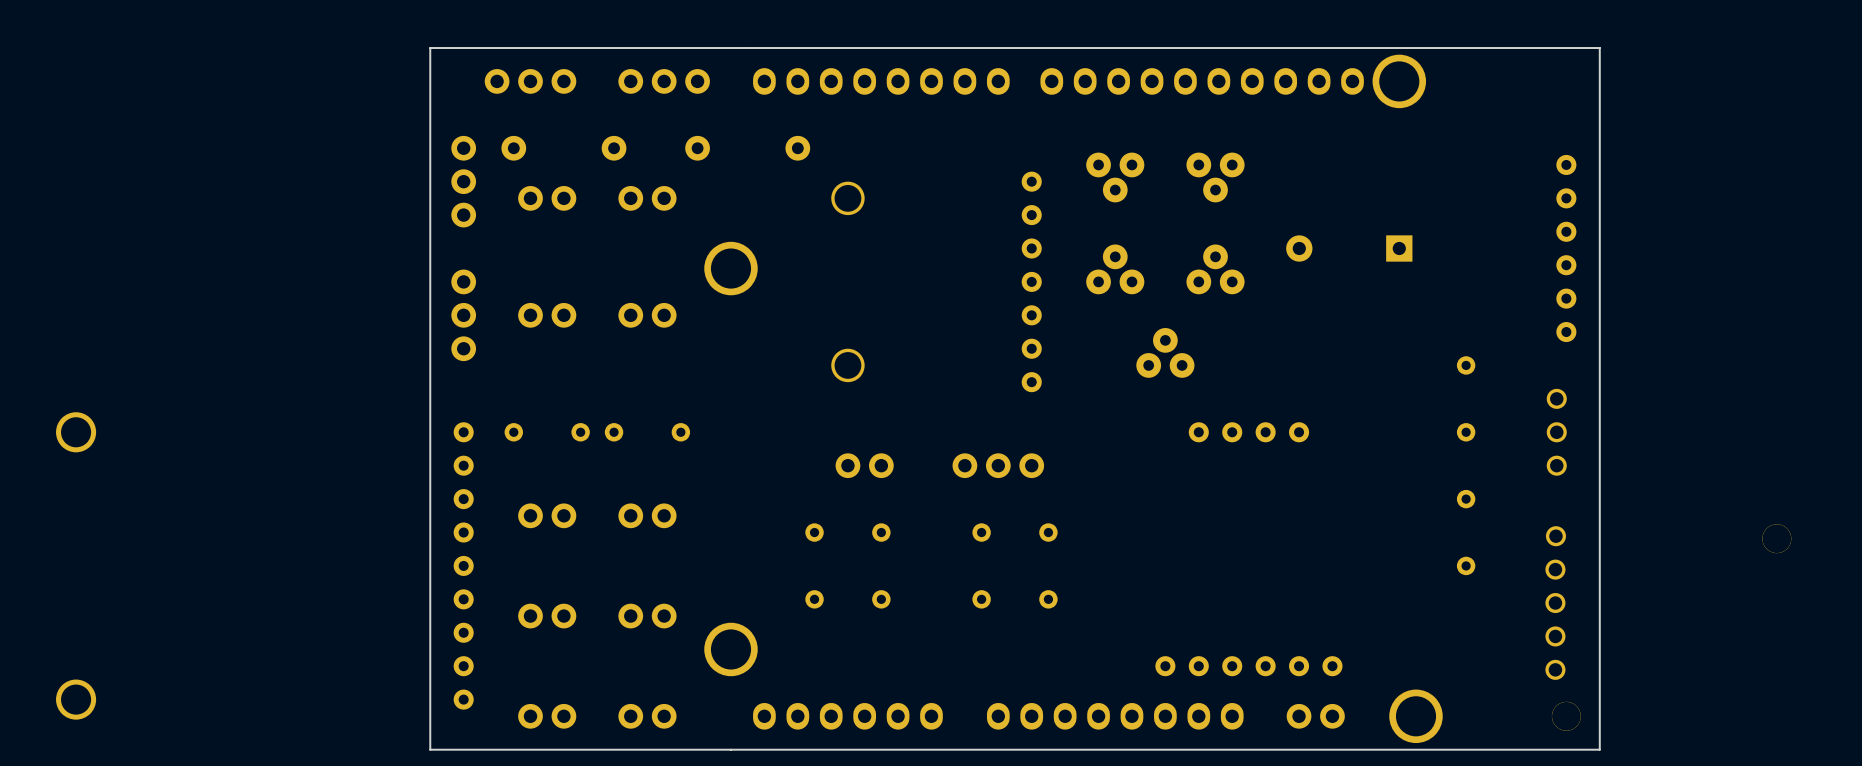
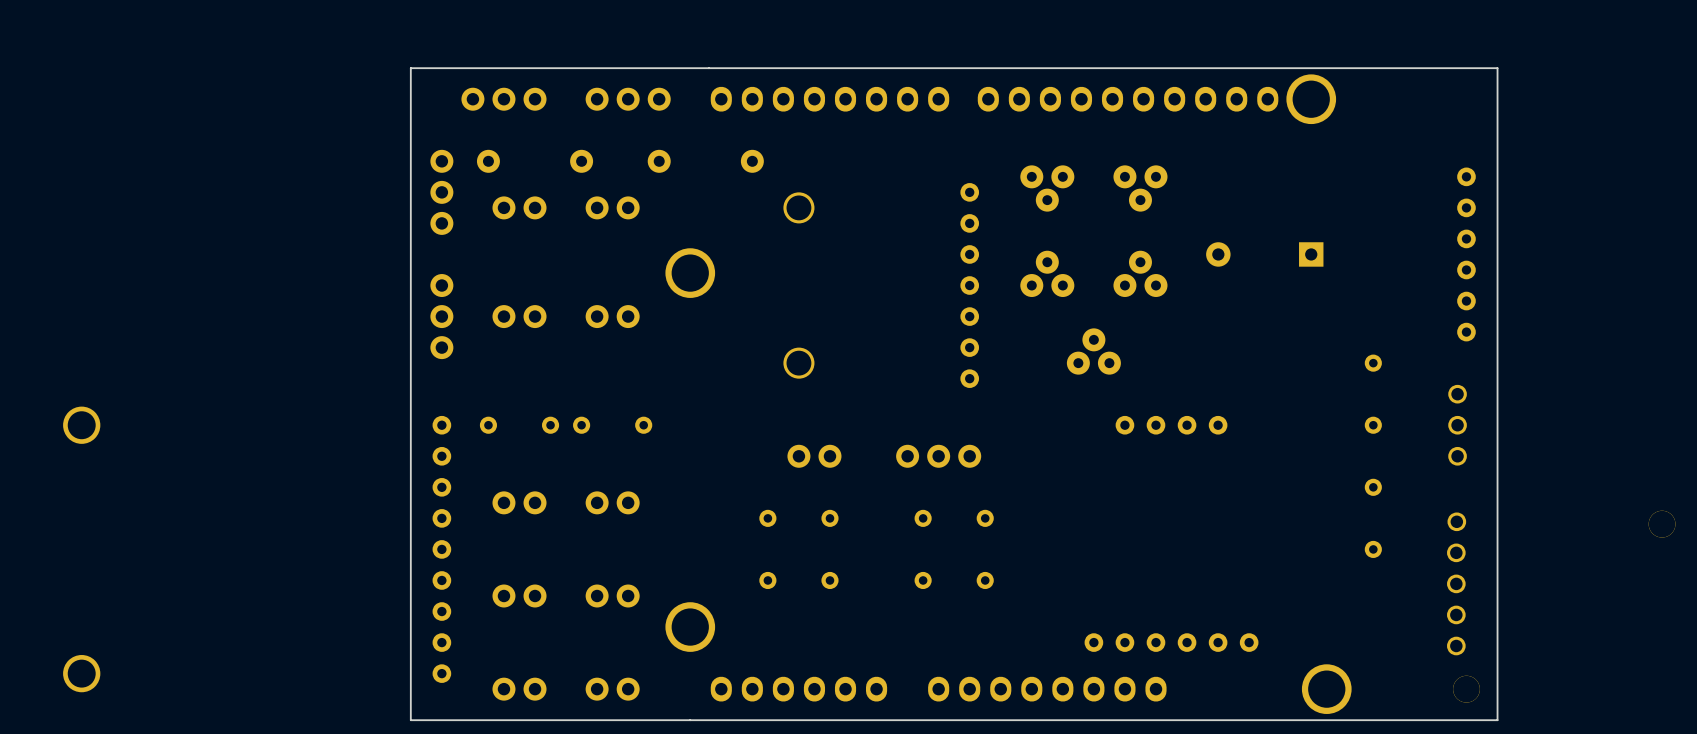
part: (1315, 716) -> none

